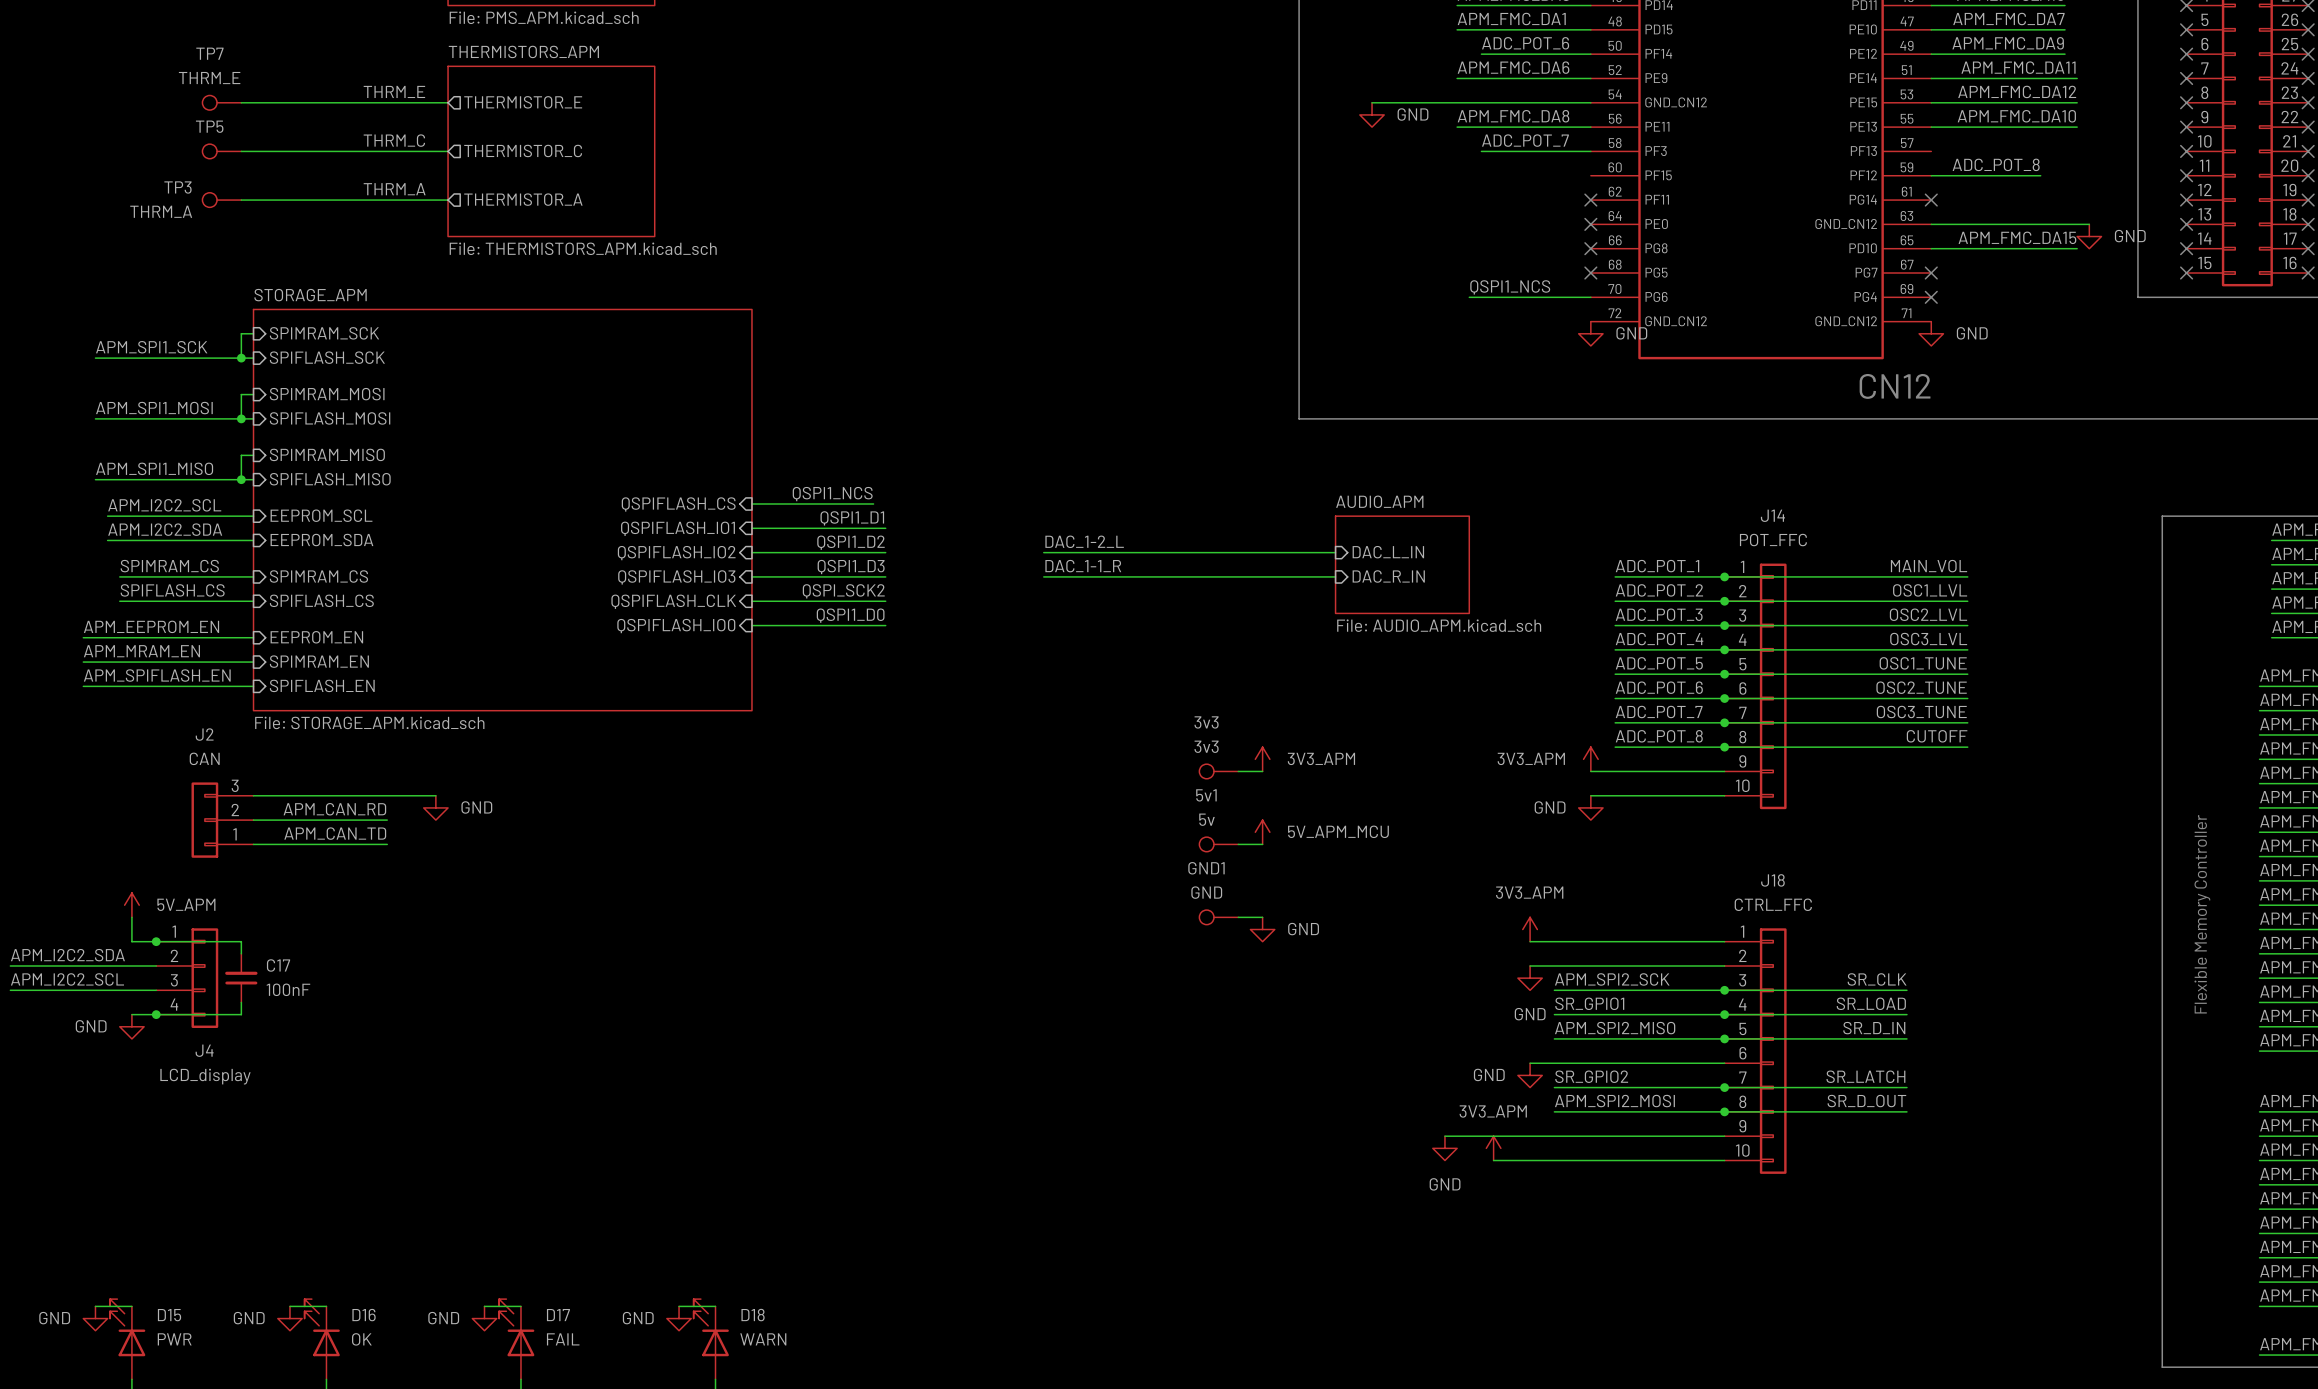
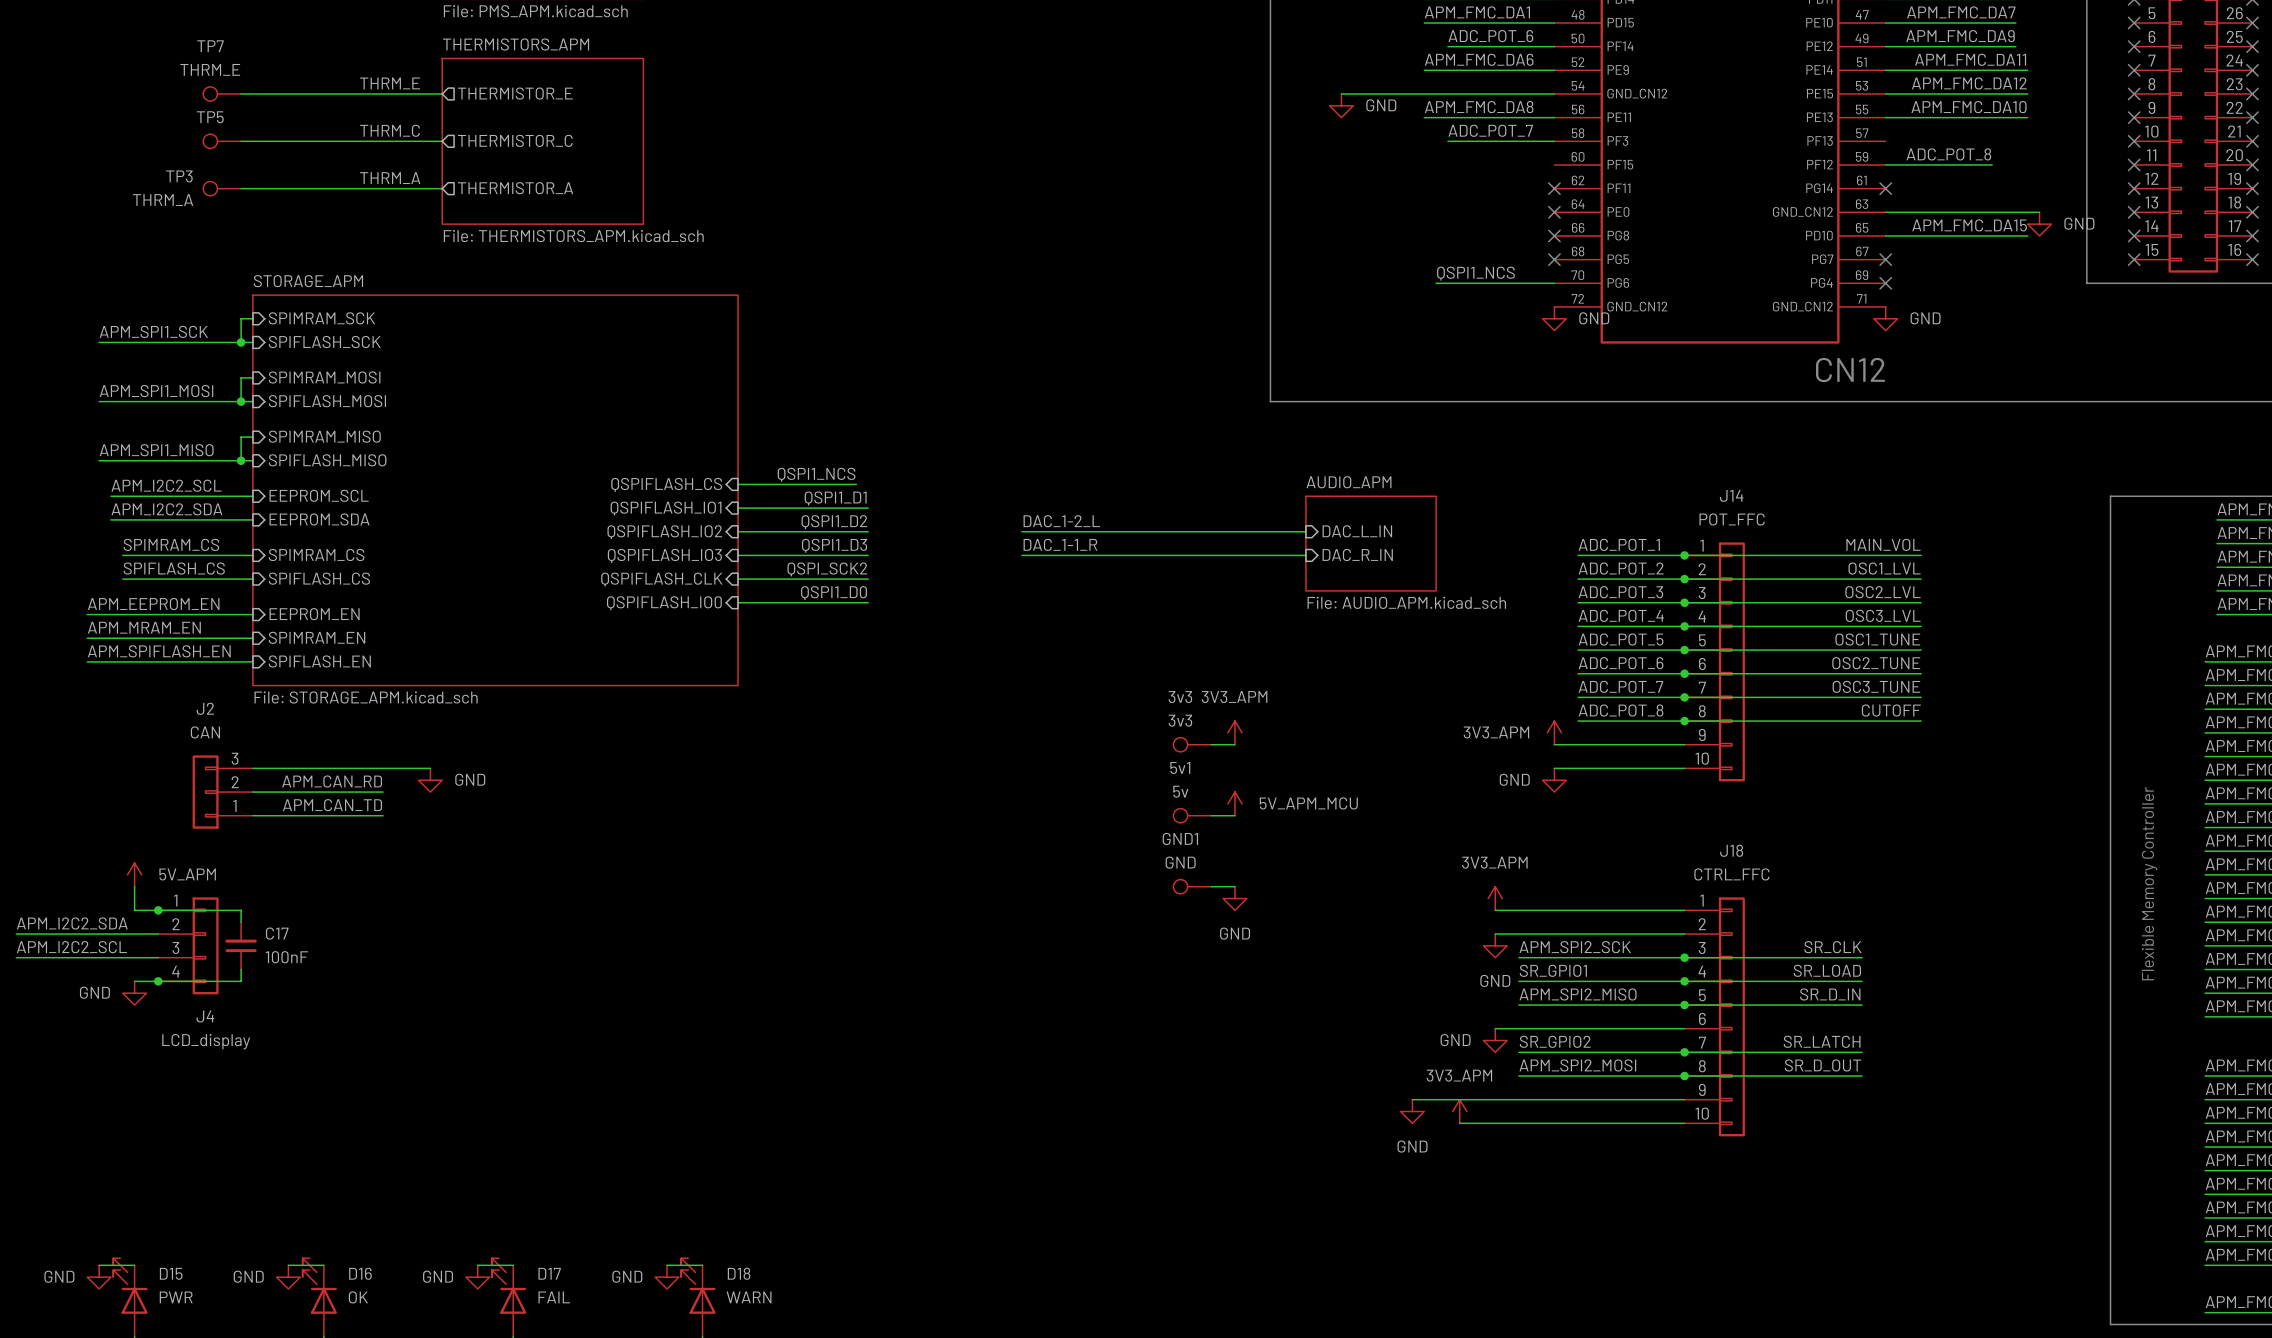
power symbol text position: 3V3_APM (1321, 758) -> 3V3_APM (1234, 697)
power symbol text position: GND (1303, 929) -> GND (1235, 933)

